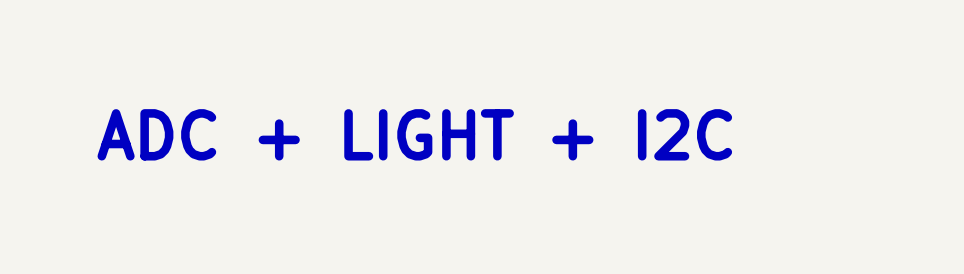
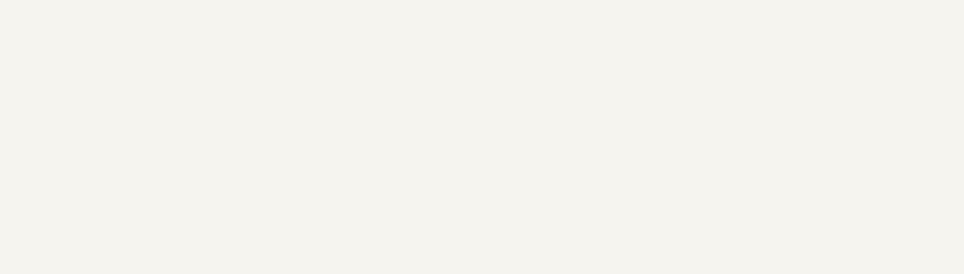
text: ADC + LIGHT + I2C (414, 134) -> none

